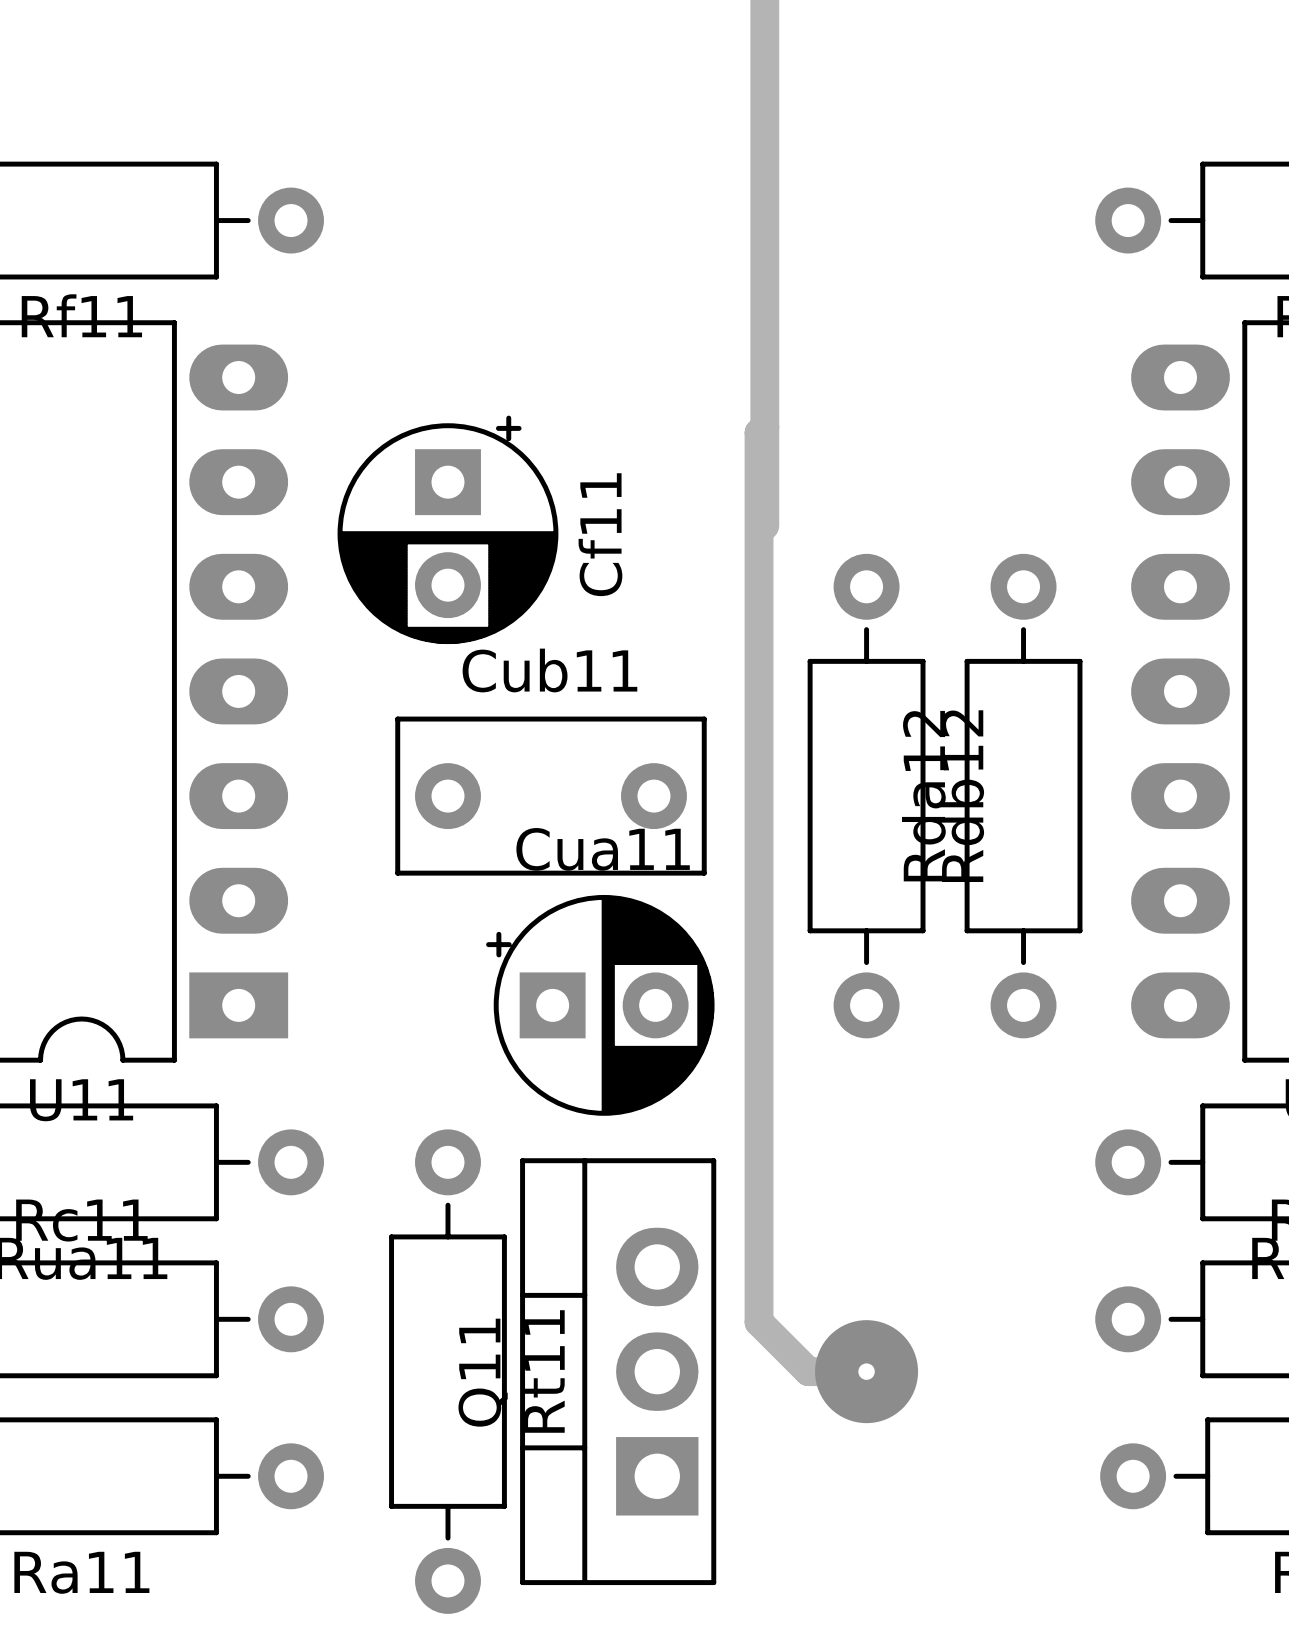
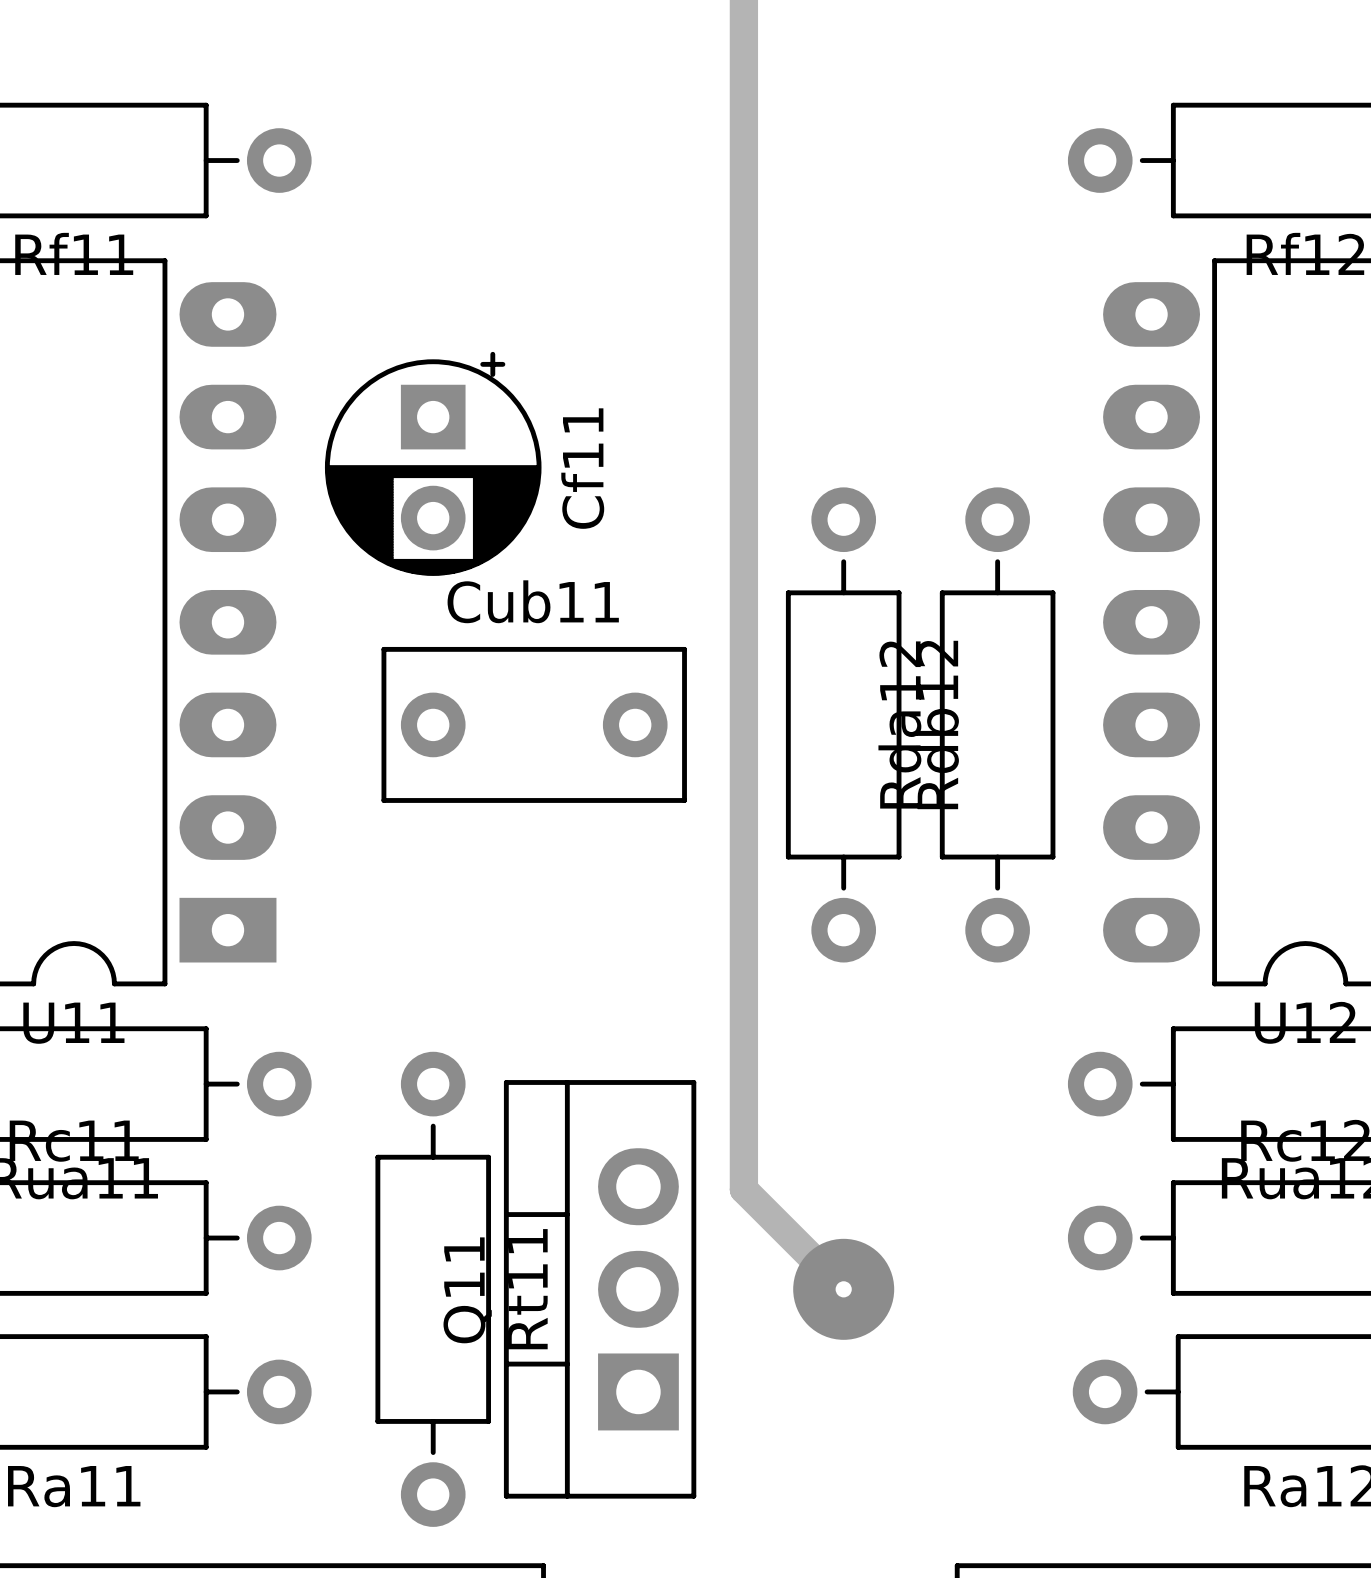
track: (764, 426) (759, 432) (759, 1322) (808, 1371) (866, 1371) -> (743, 459) (743, 1189) (843, 1289)
Cua11: (600, 1005) -> none

